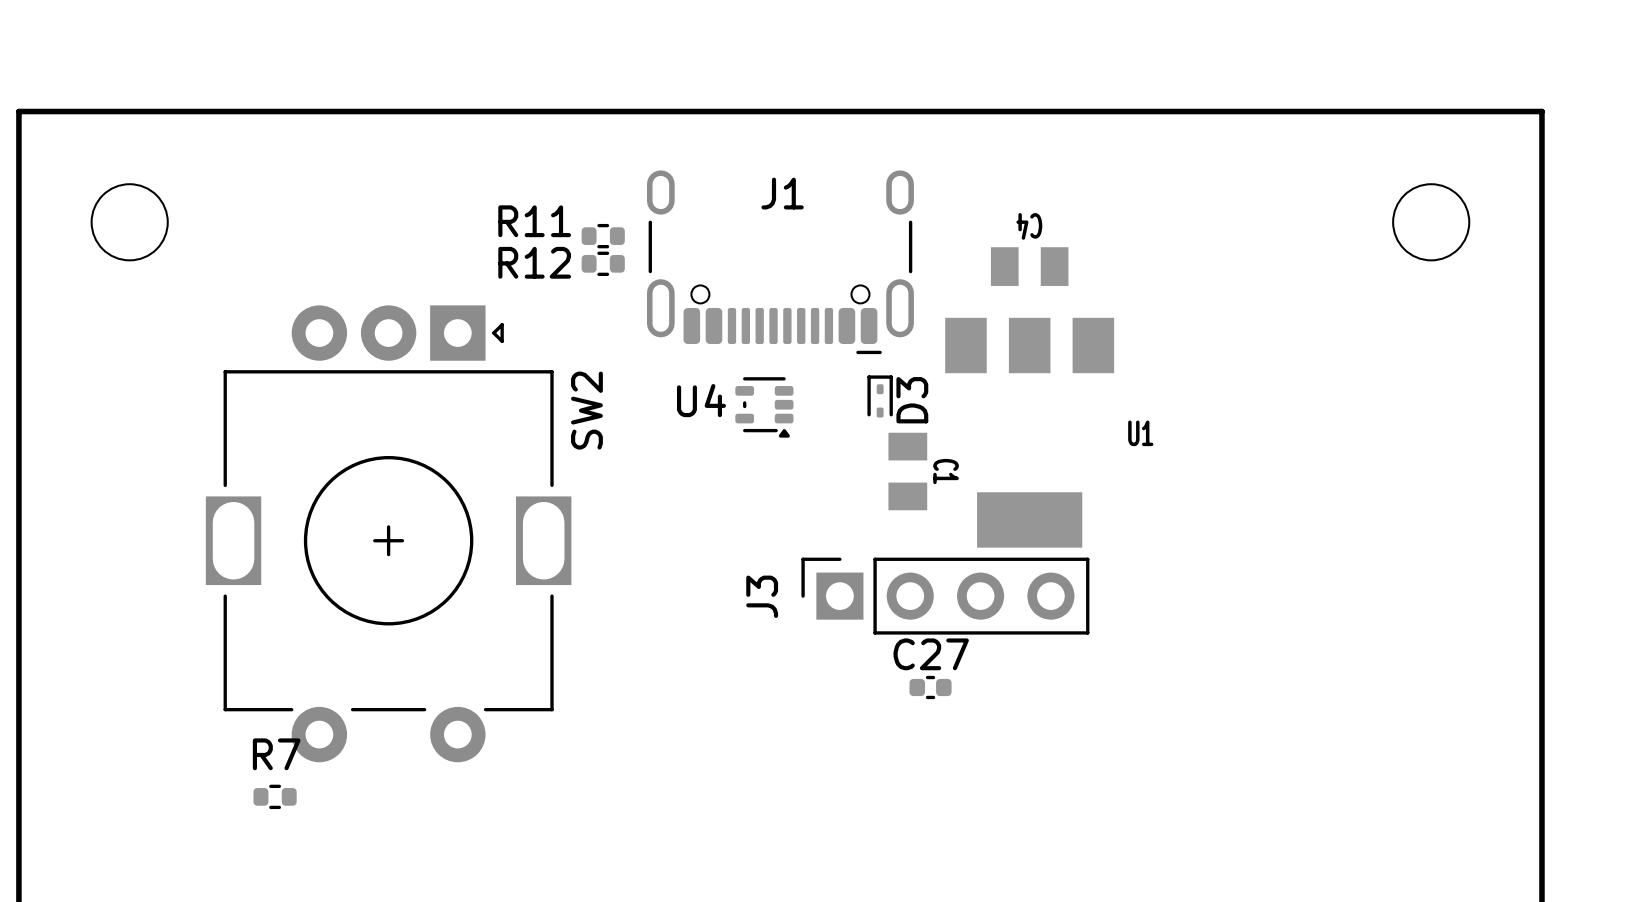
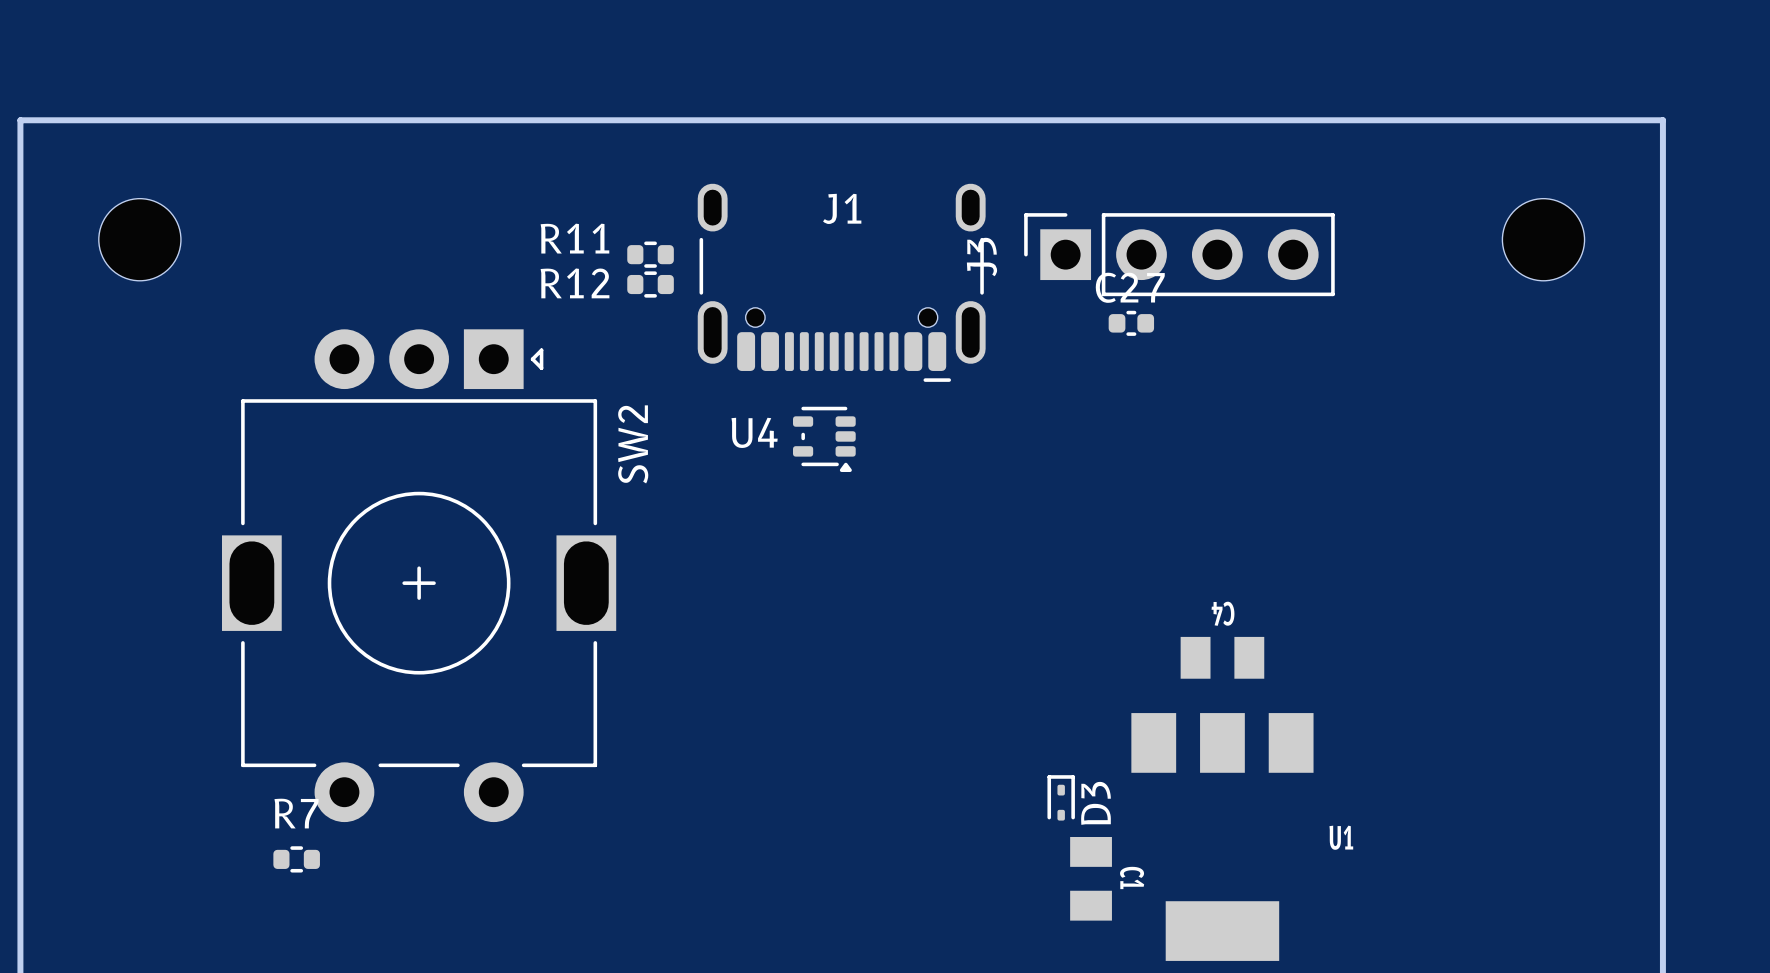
C4 position: (1029, 266) -> (1222, 657)
D3 position: (880, 396) -> (1061, 797)
U1 position: (1029, 432) -> (1222, 837)
C1 position: (907, 471) -> (1091, 878)
J3 position: (945, 596) -> (1179, 254)
C27 position: (930, 687) -> (1131, 323)

